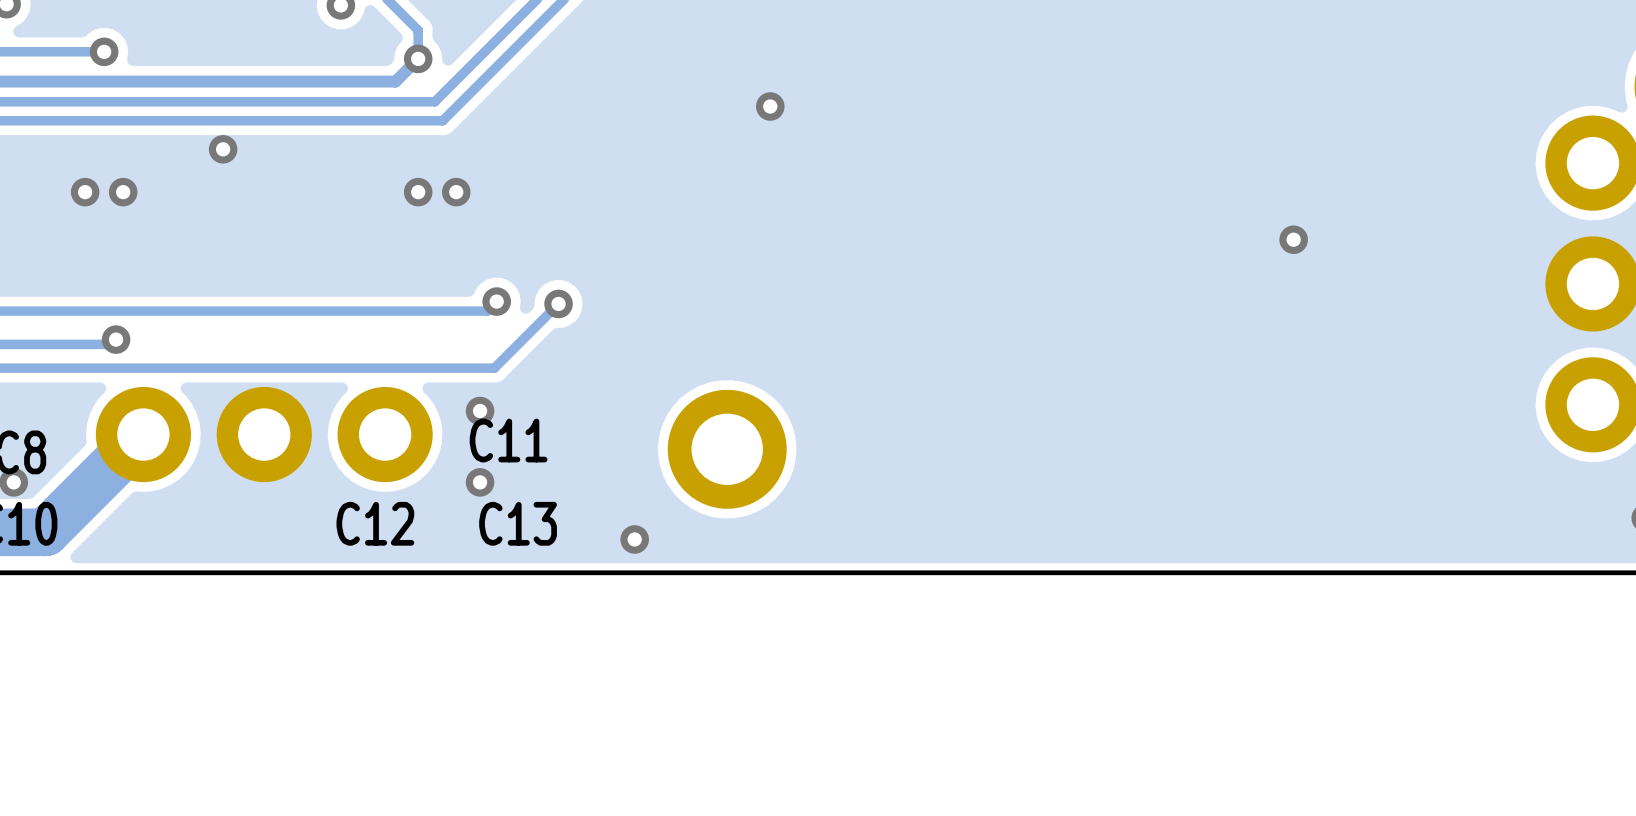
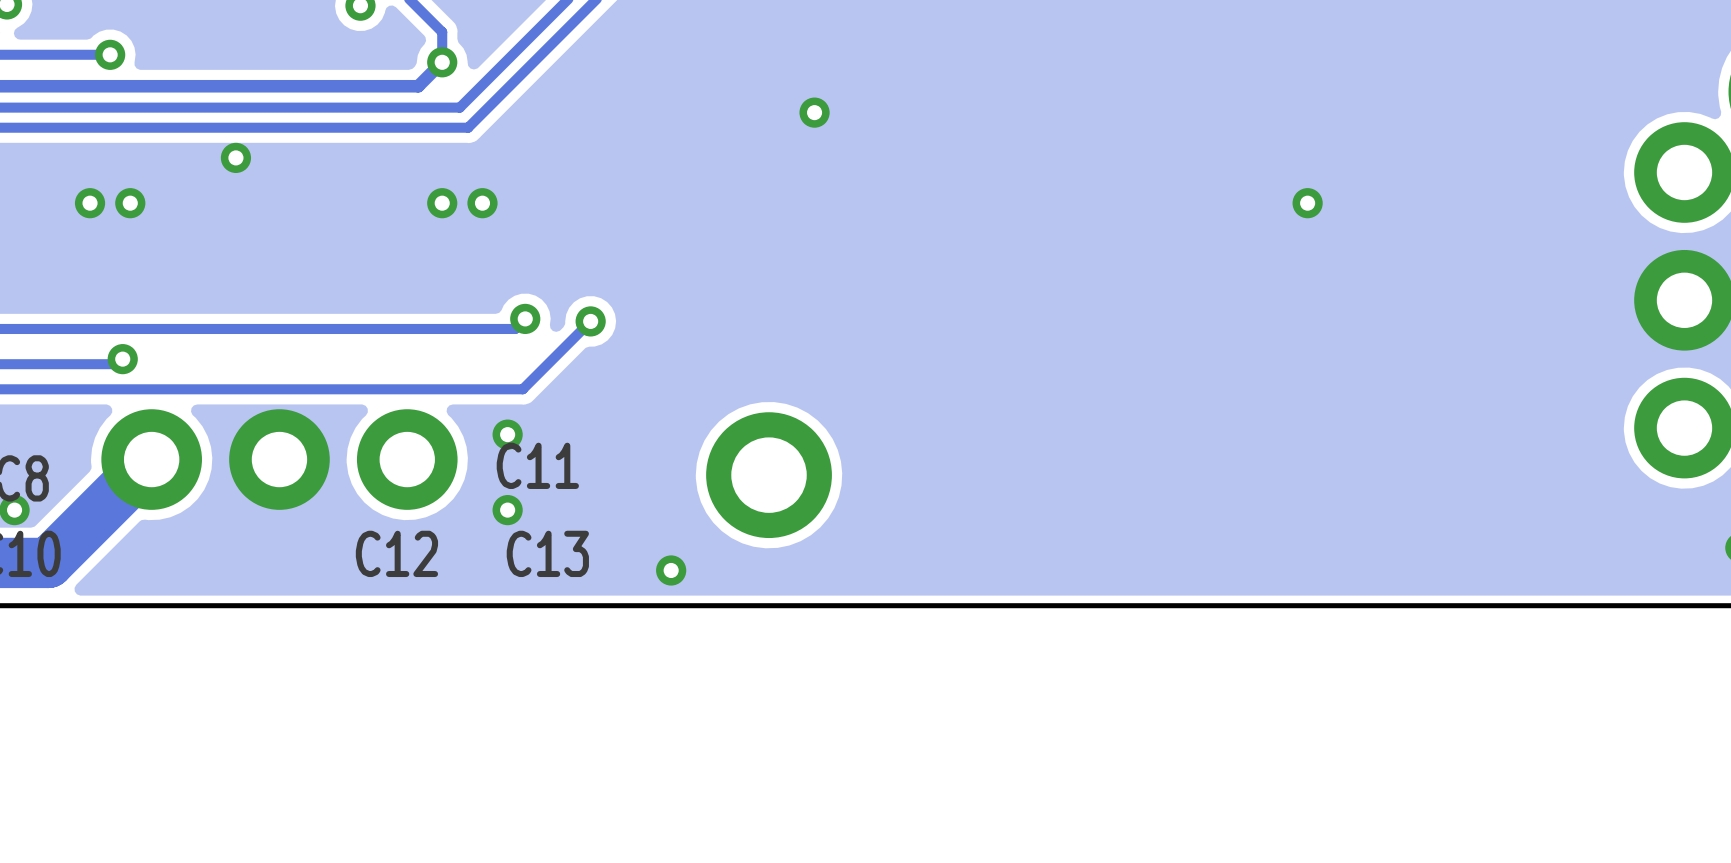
via position: (1293, 239) -> (1307, 203)

